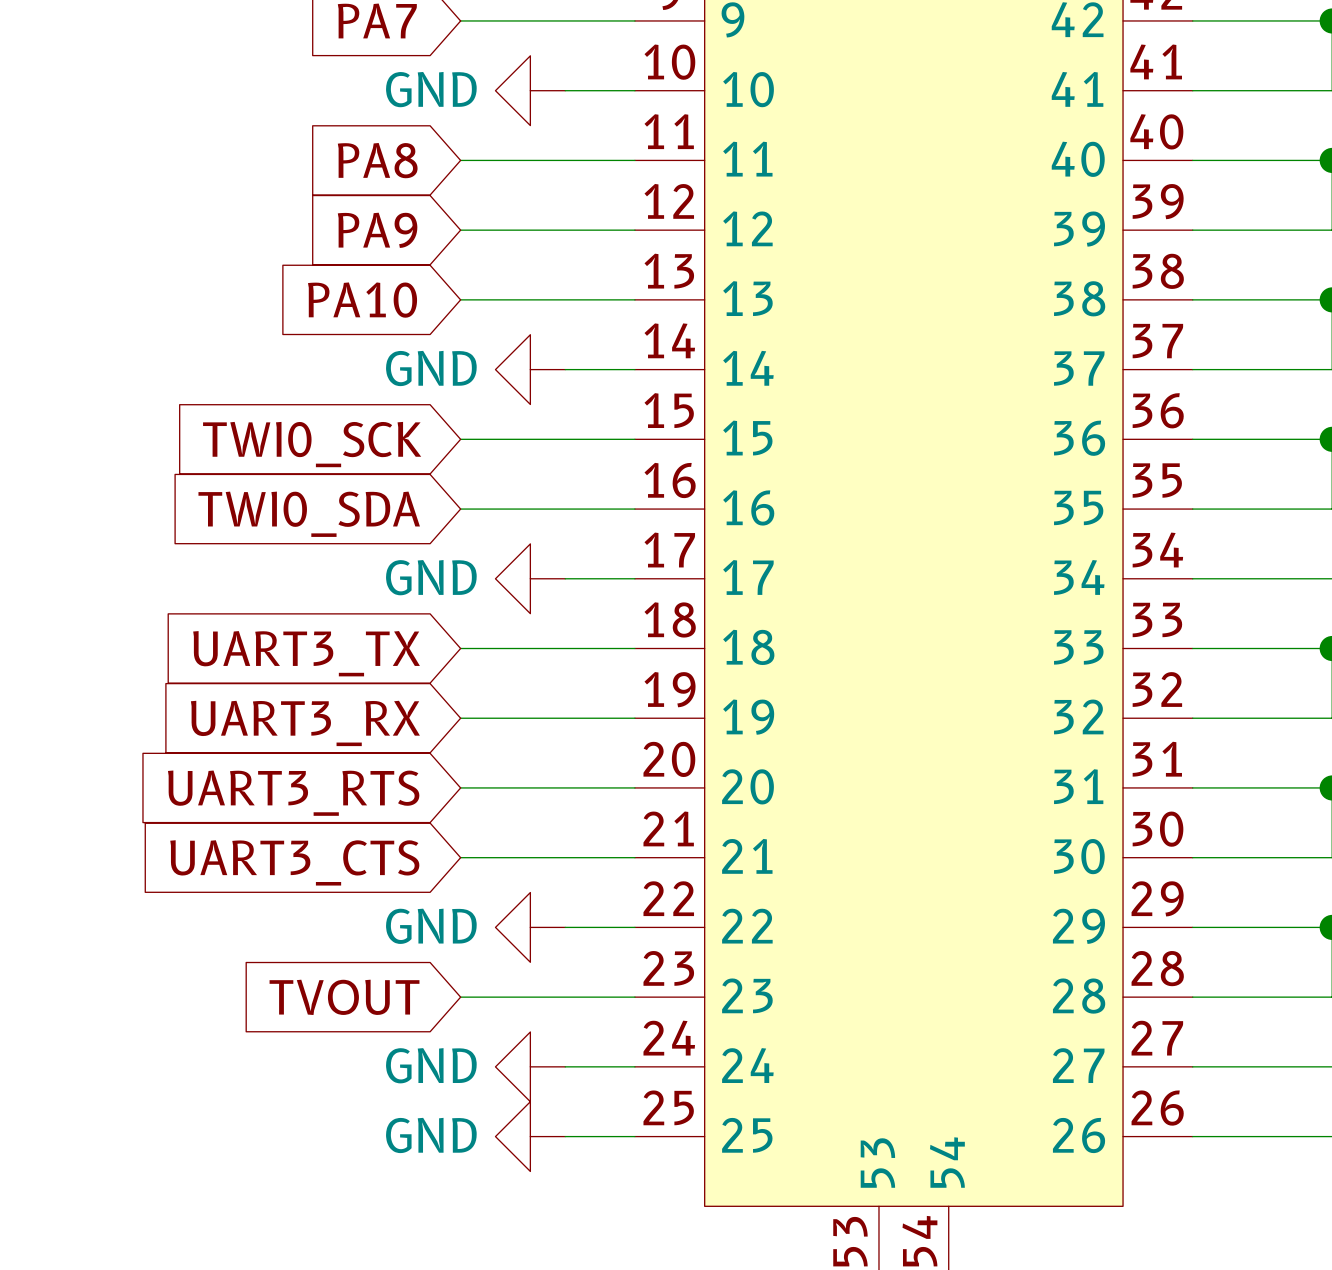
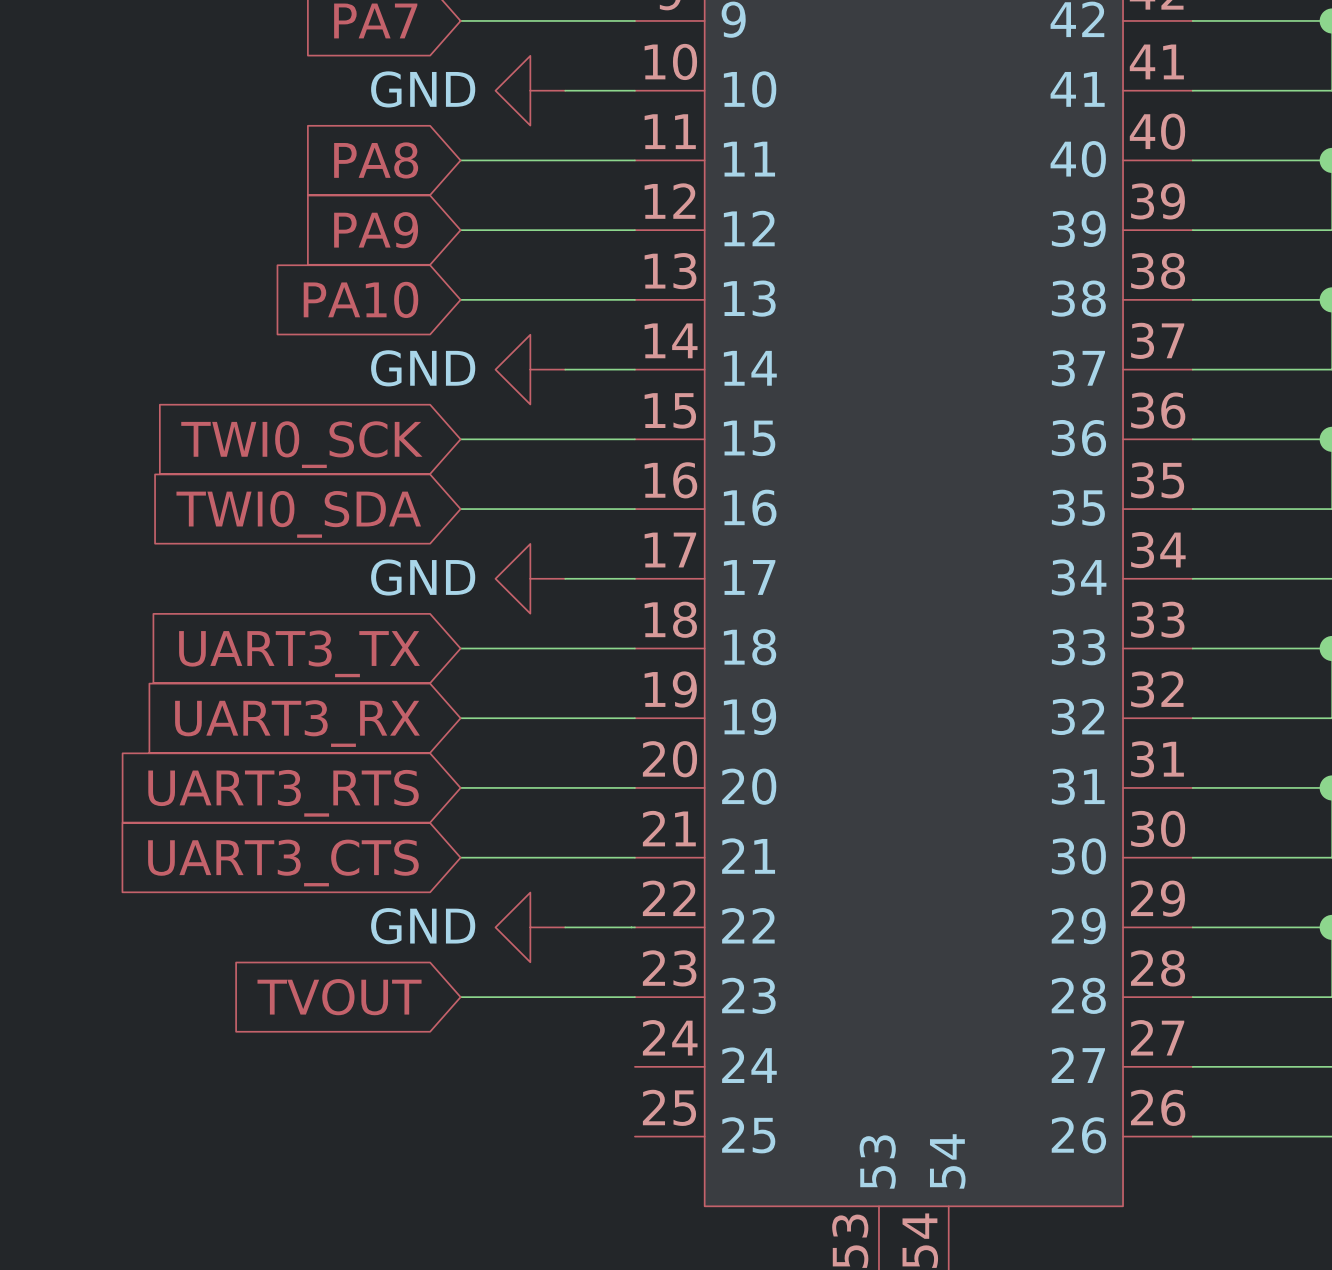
power symbol: GND (530, 1066) -> none
wire: (565, 1066) (634, 1066) -> none
power symbol: GND (530, 1136) -> none
wire: (565, 1136) (634, 1136) -> none

